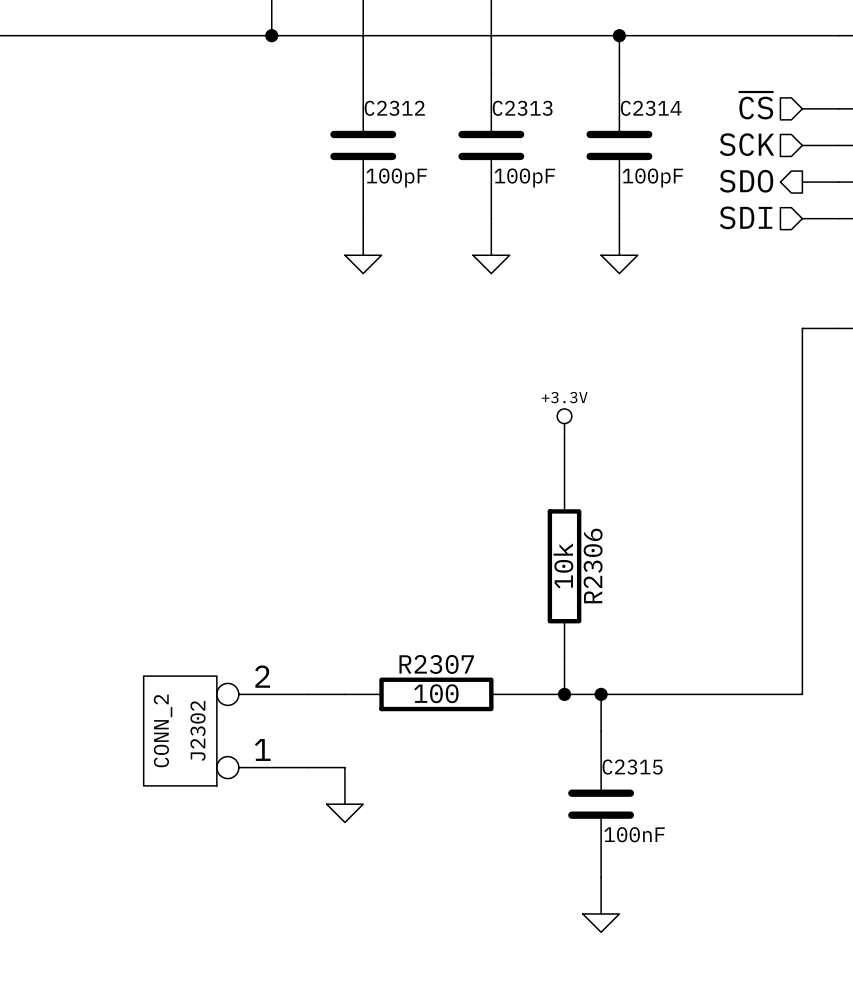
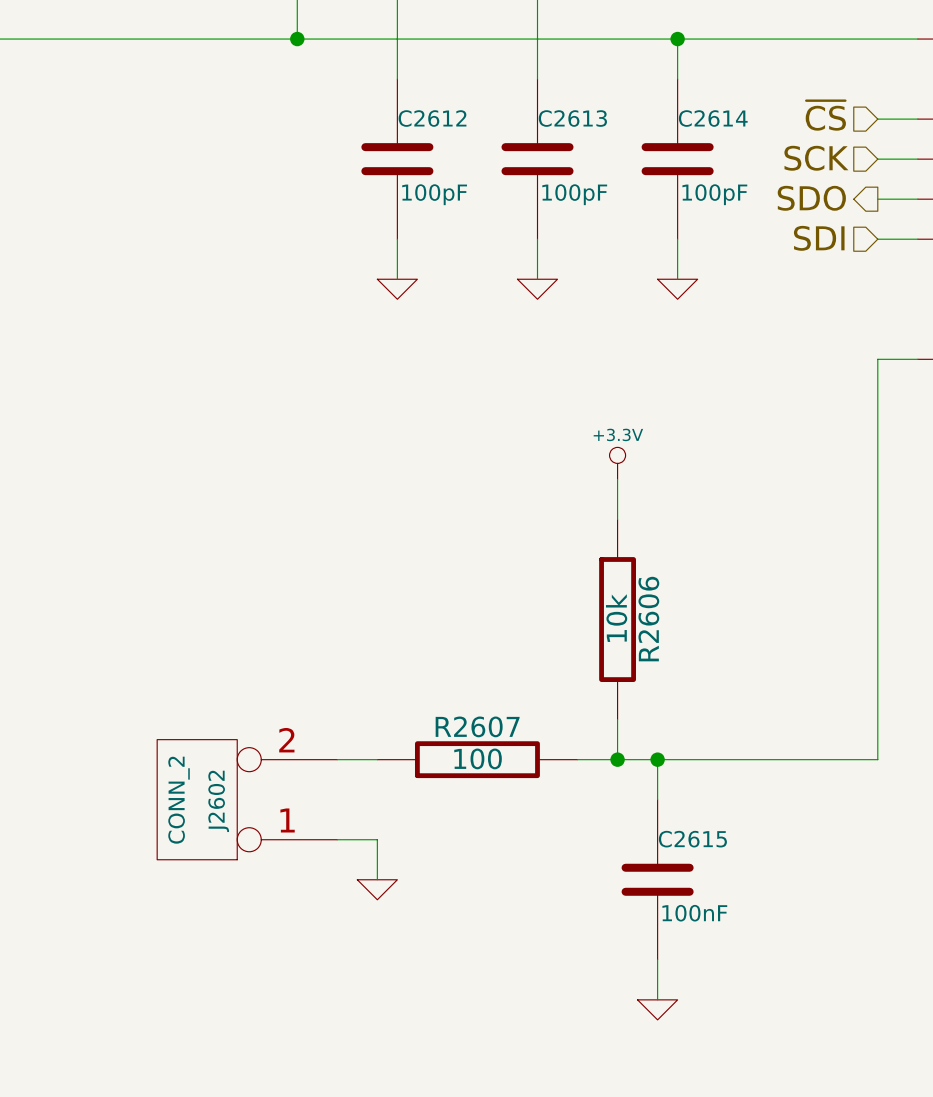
C2312 name: C2312 (394, 108) -> C2612 (432, 118)
C2313 name: C2313 (522, 108) -> C2613 (572, 118)
C2314 name: C2314 (651, 108) -> C2614 (713, 118)
R2306 name: R2306 (593, 565) -> R2606 (648, 619)
R2307 name: R2307 (436, 664) -> R2607 (477, 726)
J2302 name: J2302 (198, 730) -> J2602 (218, 801)
C2315 name: C2315 (632, 767) -> C2615 (692, 839)

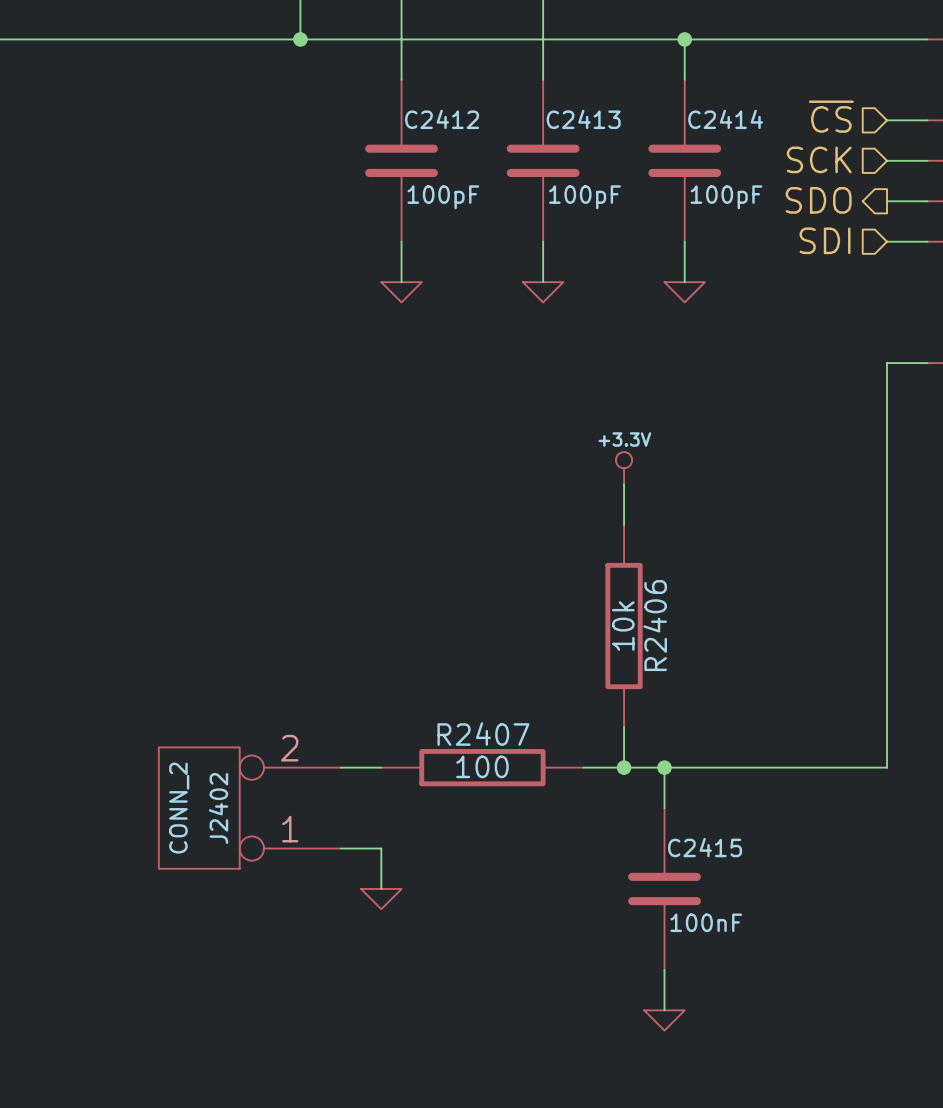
C2612 name: C2612 (432, 118) -> C2412 (442, 119)
C2613 name: C2613 (572, 118) -> C2413 (583, 119)
C2614 name: C2614 (713, 118) -> C2414 (725, 119)
R2606 name: R2606 (648, 619) -> R2406 (655, 625)
R2607 name: R2607 (477, 726) -> R2407 (483, 734)
J2602 name: J2602 (218, 801) -> J2402 (218, 808)
C2615 name: C2615 (692, 839) -> C2415 (705, 847)

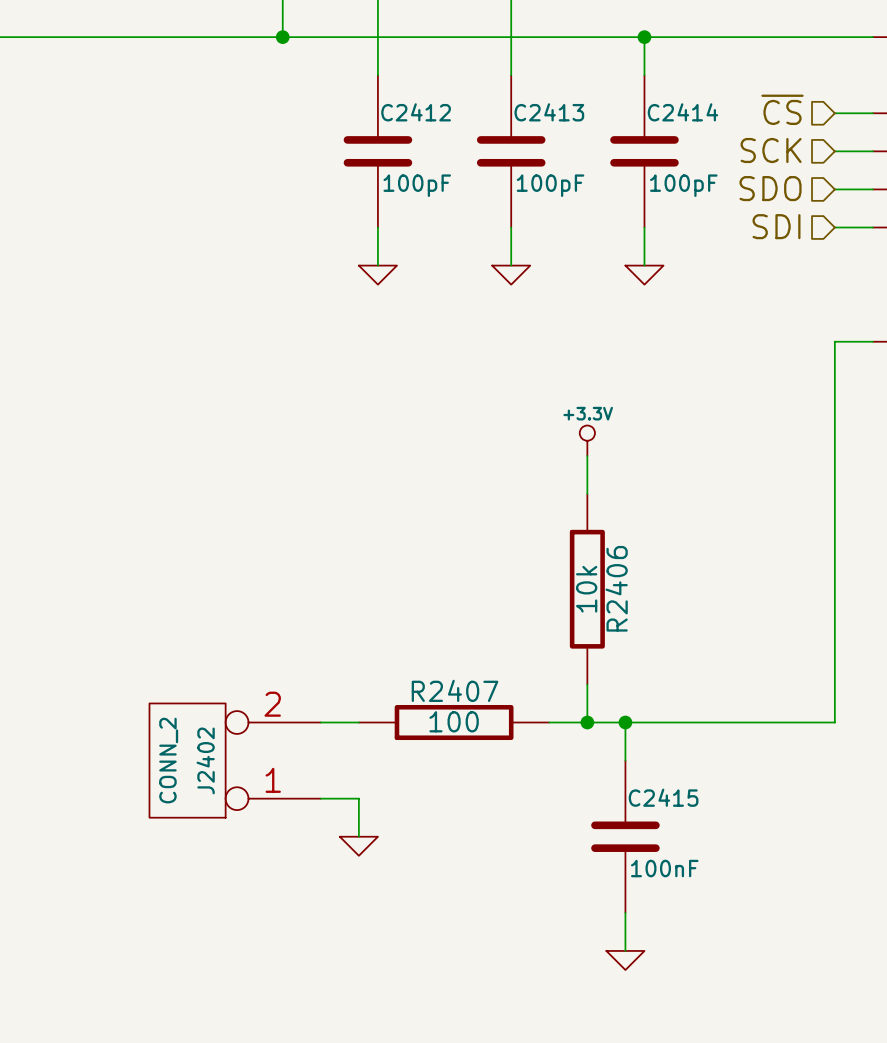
hierarchical label shape: output (818, 200) -> input (770, 188)

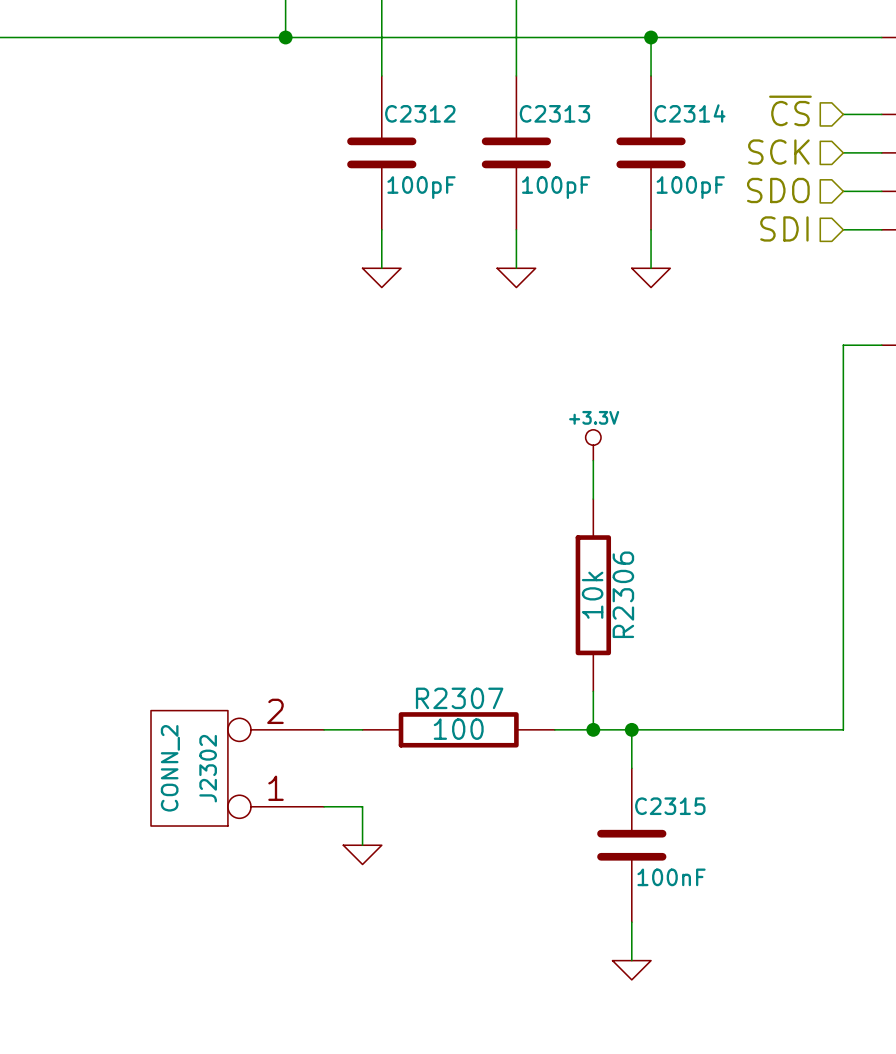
C2412 name: C2412 (416, 112) -> C2312 (420, 113)
C2413 name: C2413 (549, 112) -> C2313 (554, 113)
C2414 name: C2414 (682, 112) -> C2314 (689, 113)
R2406 name: R2406 (616, 588) -> R2306 (623, 594)
R2407 name: R2407 (455, 690) -> R2307 (459, 698)
J2402 name: J2402 (205, 760) -> J2302 (208, 768)
C2415 name: C2415 (663, 797) -> C2315 (670, 806)

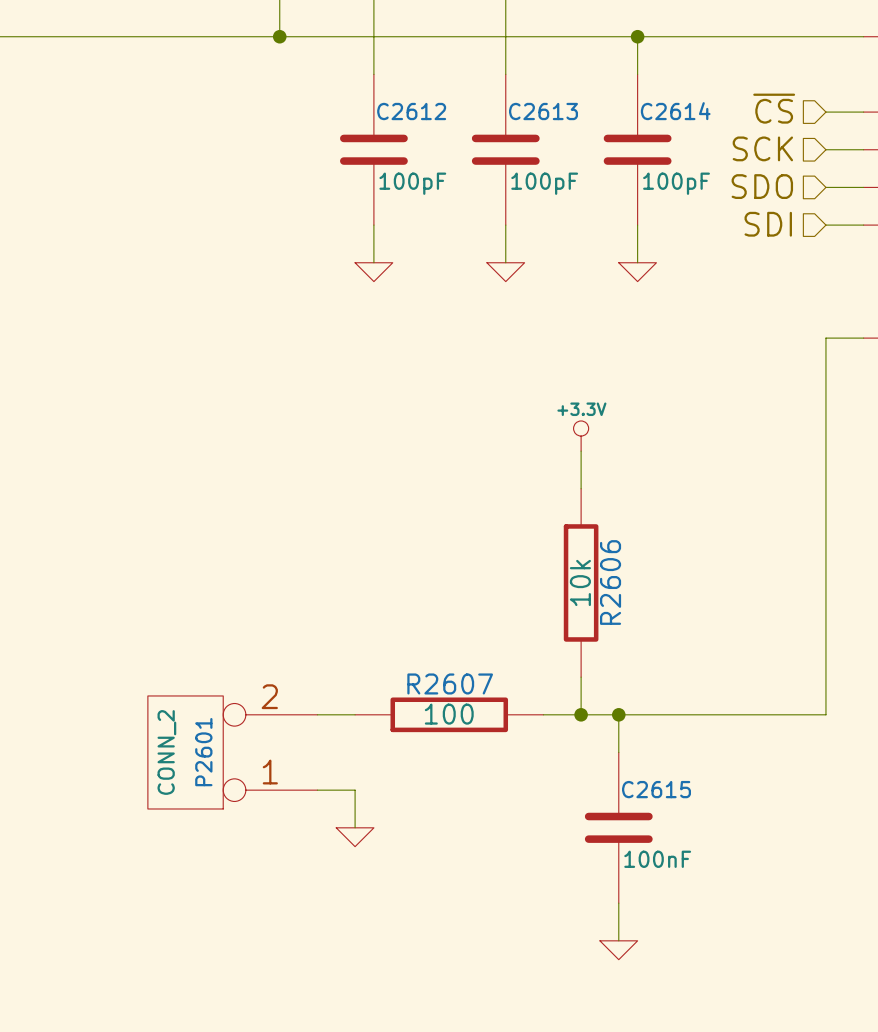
C2312 name: C2312 (420, 113) -> C2612 (411, 111)
C2313 name: C2313 (554, 113) -> C2613 (543, 111)
C2314 name: C2314 (689, 113) -> C2614 (675, 111)
R2306 name: R2306 (623, 594) -> R2606 (610, 582)
R2307 name: R2307 (459, 698) -> R2607 (450, 683)
J2302 name: J2302 (208, 768) -> P2601 (203, 752)
C2315 name: C2315 (670, 806) -> C2615 (656, 789)

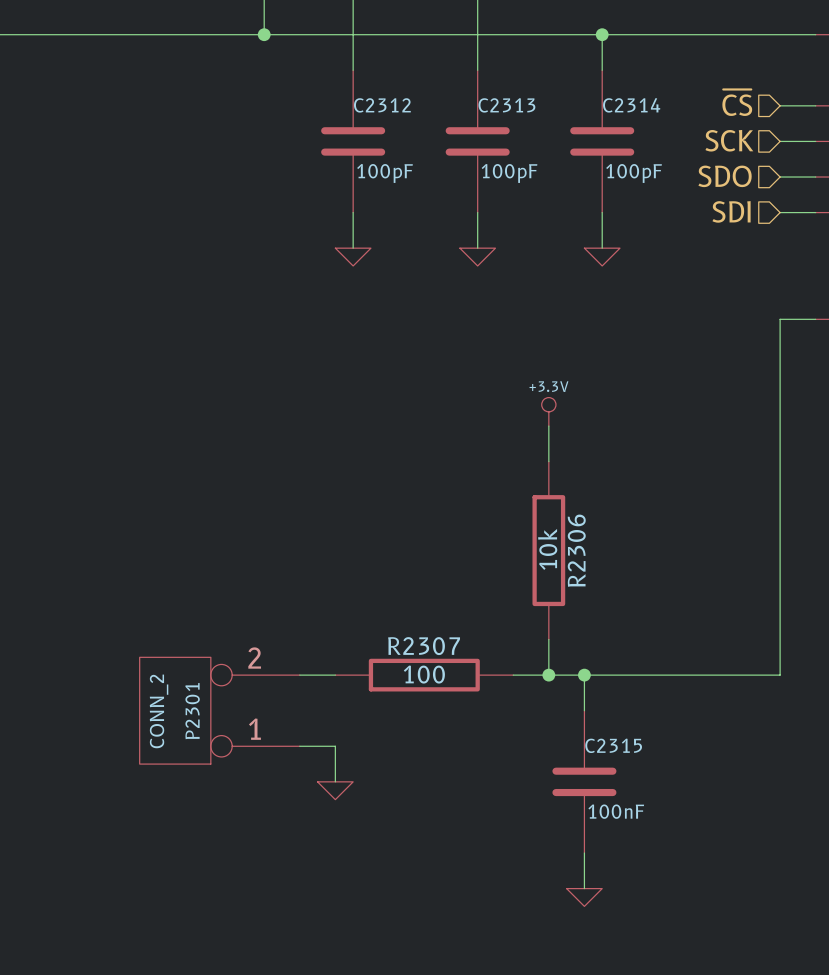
C2612 name: C2612 (411, 111) -> C2312 (382, 105)
C2613 name: C2613 (543, 111) -> C2313 (506, 105)
C2614 name: C2614 (675, 111) -> C2314 (631, 105)
R2606 name: R2606 (610, 582) -> R2306 (576, 550)
R2607 name: R2607 (450, 683) -> R2307 (424, 646)
P2601 name: P2601 (203, 752) -> P2301 (192, 711)
C2615 name: C2615 (656, 789) -> C2315 (613, 745)

